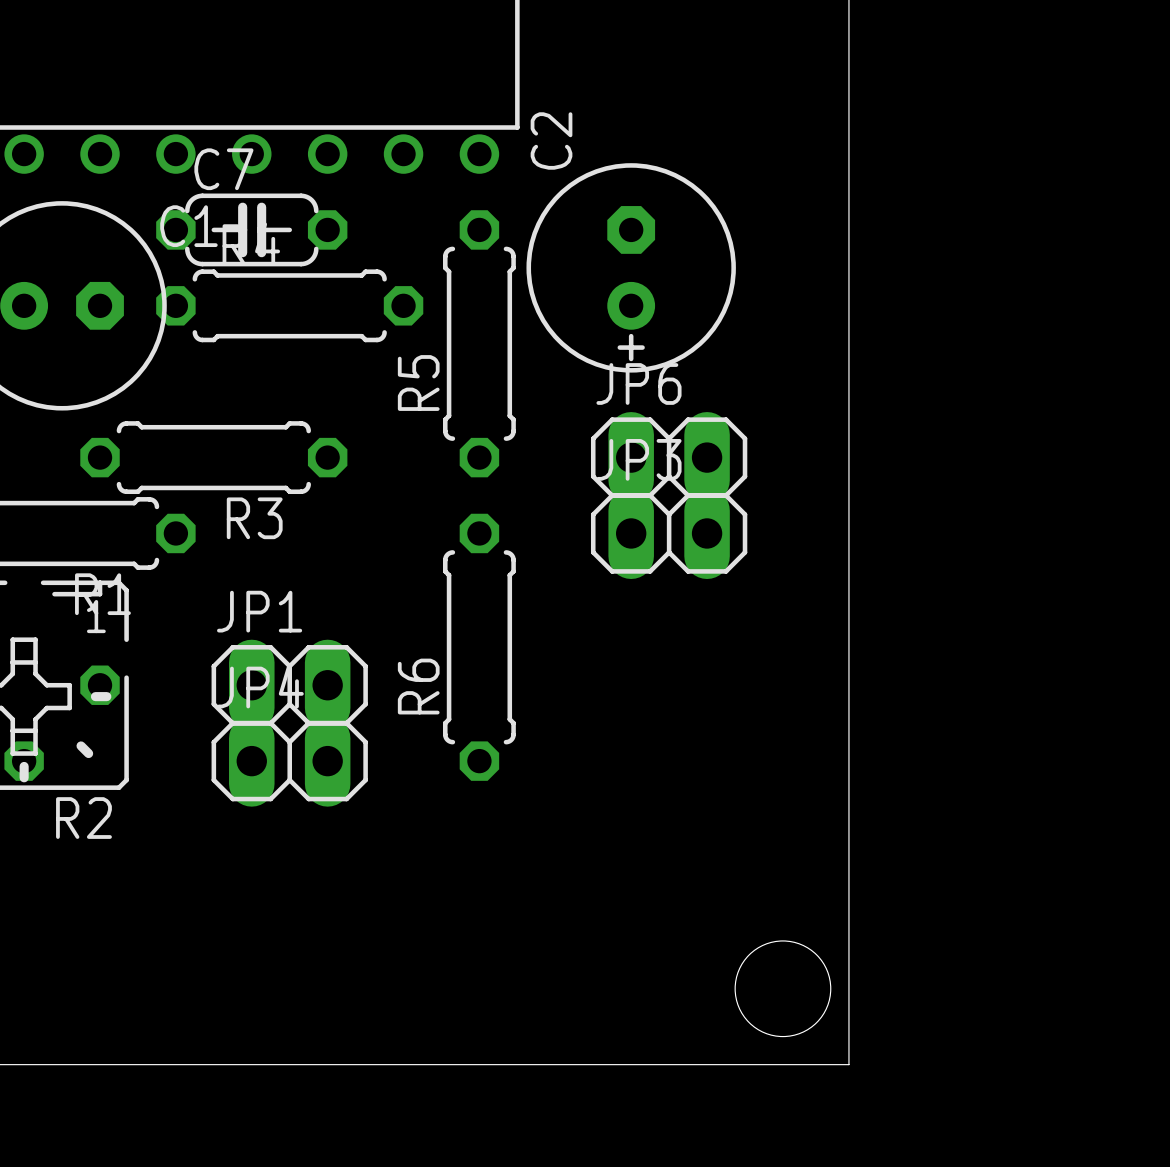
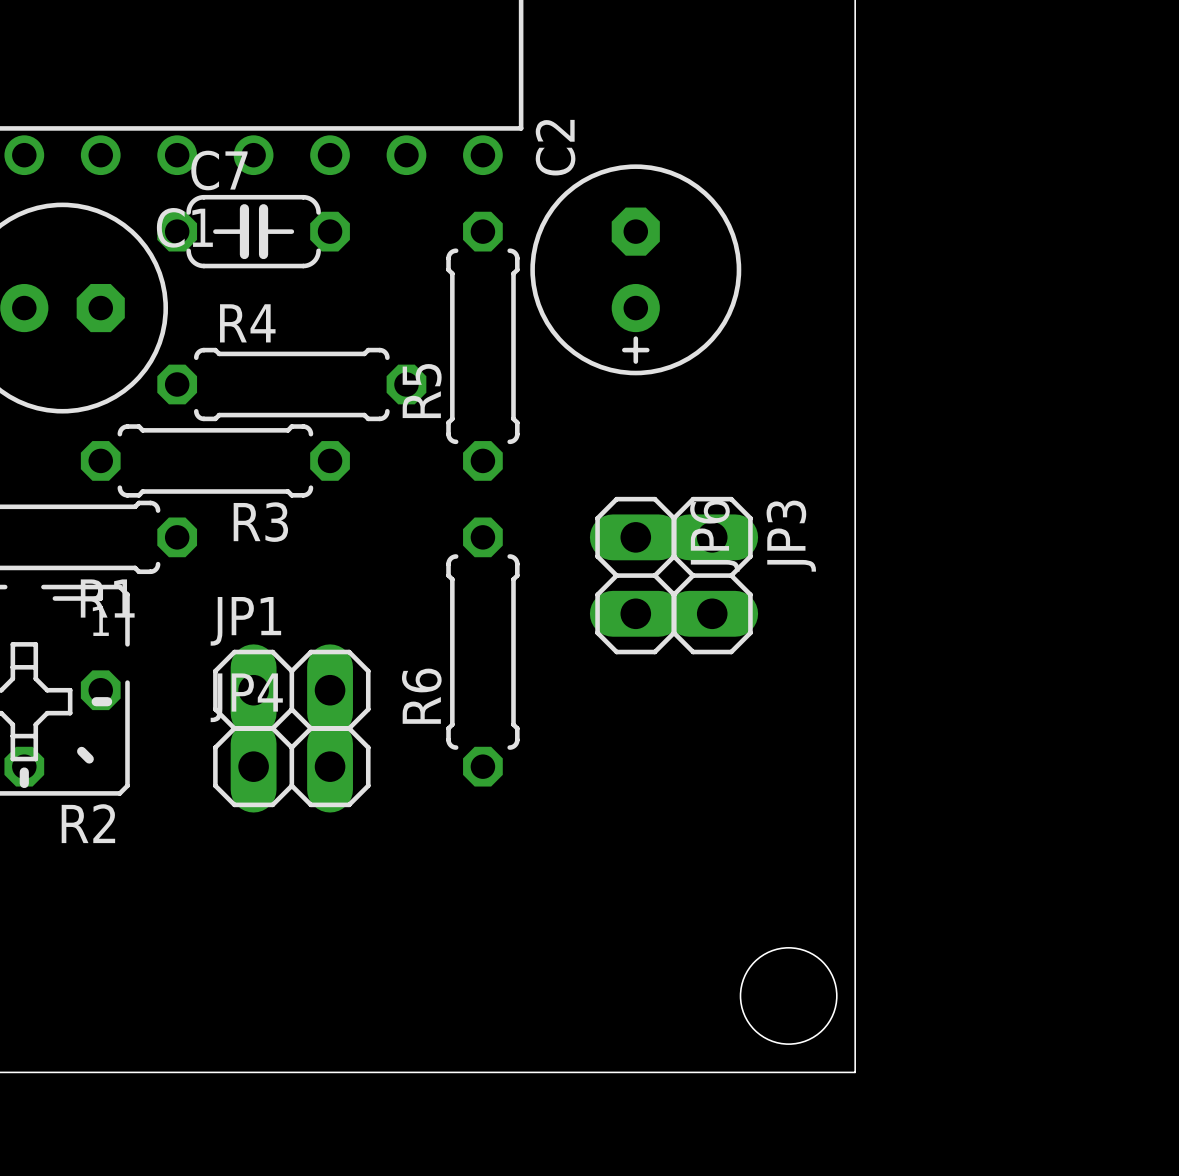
R4 position: (289, 305) -> (291, 384)
JP6 rotation: 0° (669, 457) -> 90° clockwise (635, 575)
JP6 position: (669, 457) -> (635, 575)
JP3 rotation: 0° (669, 533) -> 90° clockwise (712, 575)

